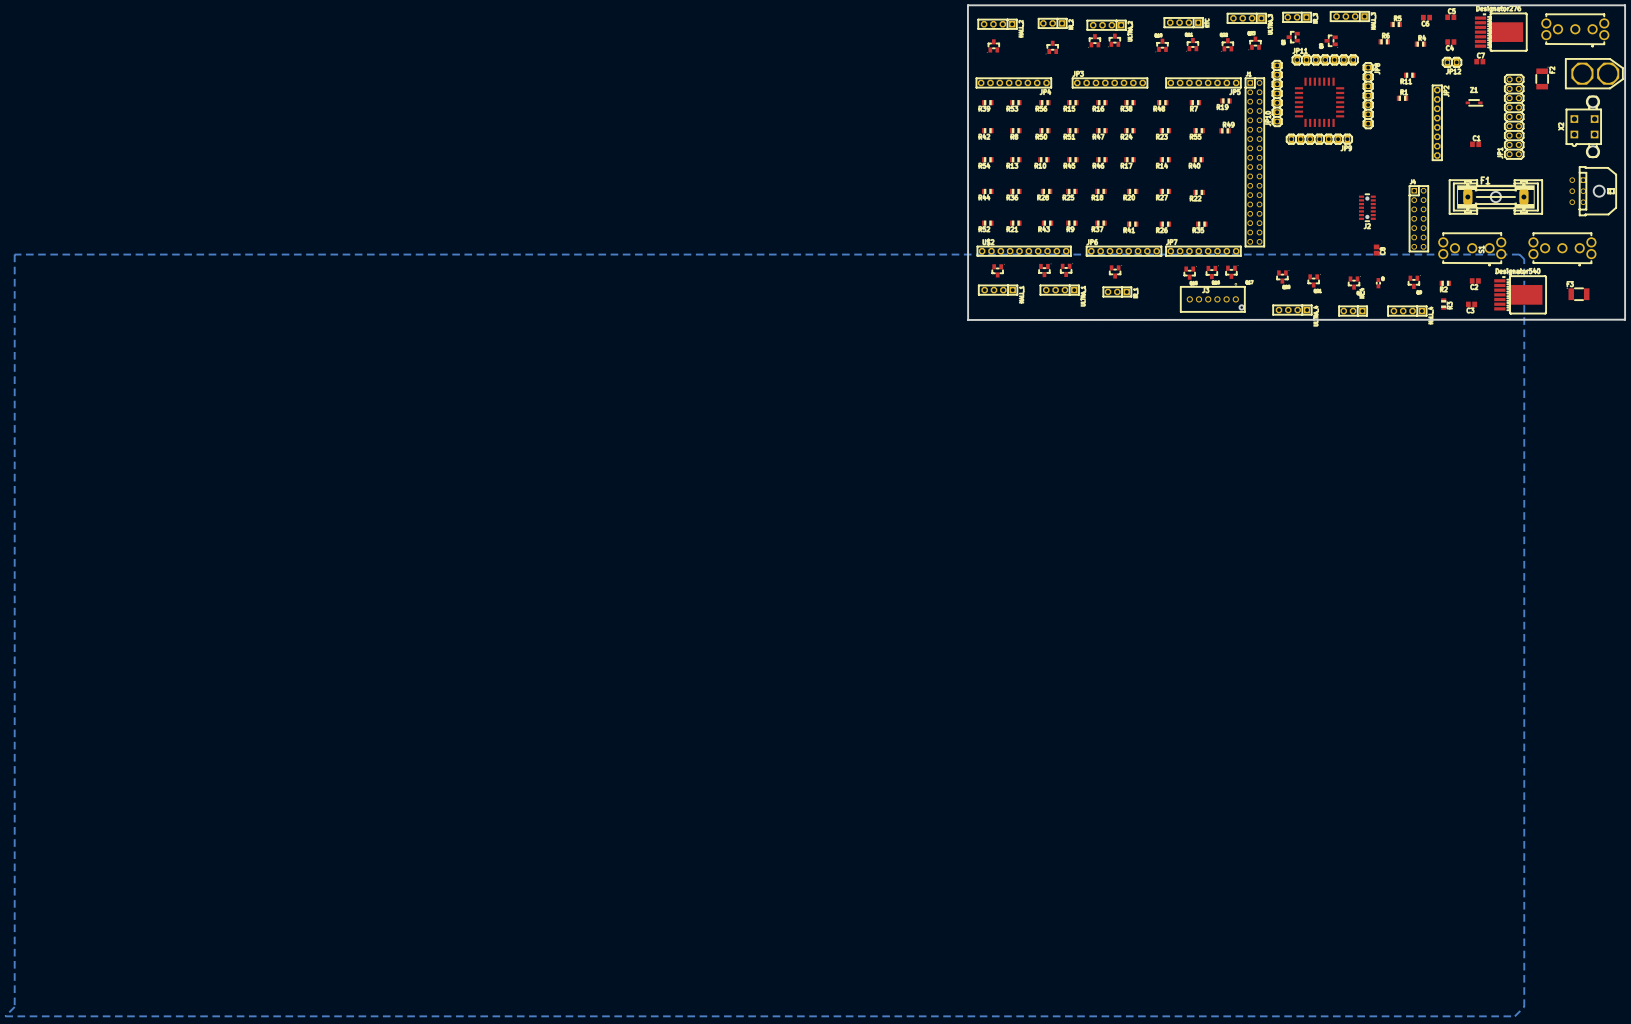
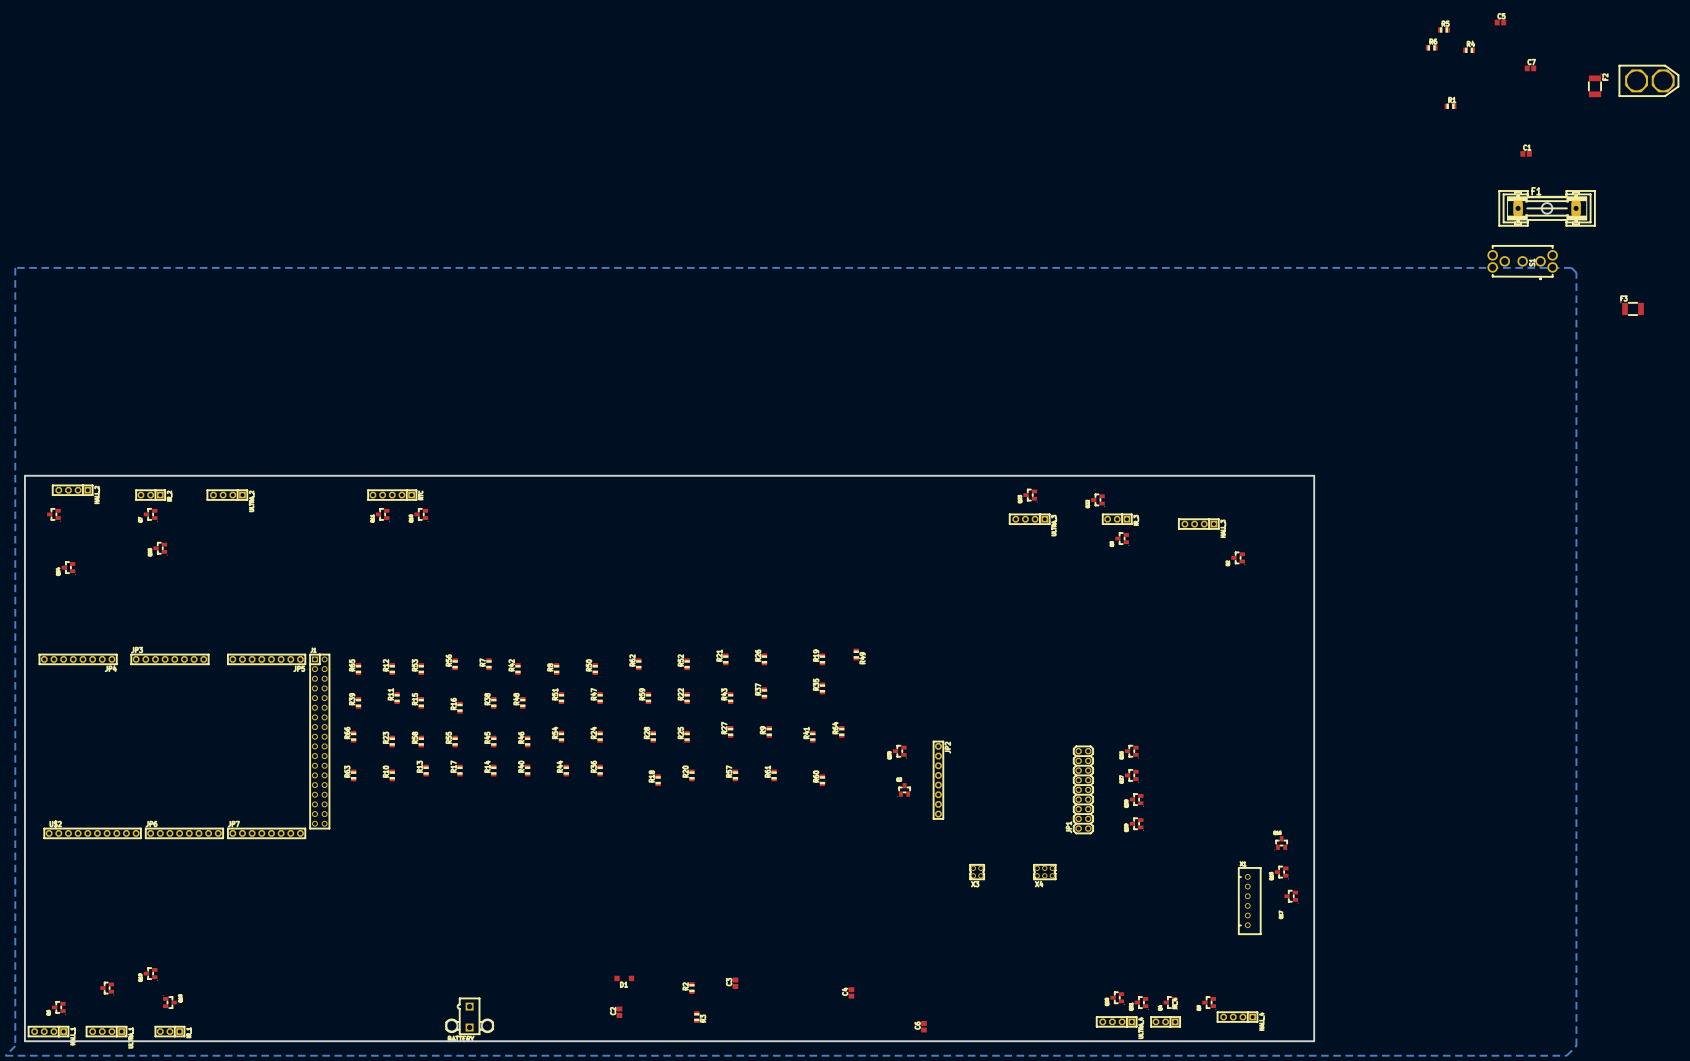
board edge: (967, 5) (1625, 5) (1625, 319) (968, 319) (967, 5) -> none
part position: (1349, 16) -> (1198, 524)
part position: (1297, 17) -> (1117, 519)
part rotation: 0° (1426, 17) -> 90° clockwise (923, 1026)
part position: (1426, 17) -> (923, 1026)
part position: (1246, 18) -> (1029, 519)
part: (1183, 22) -> none
part position: (1052, 23) -> (150, 495)
part position: (997, 24) -> (72, 490)
part position: (1106, 25) -> (227, 495)
part: (1575, 30) -> none
part: (1501, 32) -> none
part position: (1293, 37) -> (1238, 558)
part: (1094, 40) -> none
part: (1114, 40) -> none
part position: (1331, 41) -> (1122, 539)
part rotation: 0° (1450, 41) -> 90° clockwise (851, 992)
part position: (1450, 41) -> (851, 992)
part rotation: 0° (1254, 43) -> 90° counterclockwise (1030, 495)
part position: (1254, 43) -> (1030, 495)
part rotation: 0° (1192, 44) -> 90° counterclockwise (382, 515)
part position: (1192, 44) -> (382, 515)
part rotation: 0° (1227, 44) -> 90° counterclockwise (1098, 500)
part position: (1227, 44) -> (1098, 500)
part rotation: 0° (1161, 45) -> 90° counterclockwise (421, 515)
part position: (1161, 45) -> (421, 515)
part: (993, 46) -> none
part: (1051, 47) -> none
part: (1325, 59) -> none
part: (1452, 62) -> none
part rotation: 0° (1409, 75) -> 90° clockwise (397, 698)
part position: (1409, 75) -> (397, 698)
part position: (1013, 82) -> (78, 659)
part position: (1110, 82) -> (169, 659)
part position: (1203, 82) -> (266, 659)
part: (1277, 93) -> none
part: (1368, 95) -> none
part rotation: 0° (1226, 100) -> 90° clockwise (822, 659)
part position: (1226, 100) -> (822, 659)
part rotation: 0° (987, 102) -> 90° clockwise (358, 702)
part position: (987, 102) -> (358, 702)
part rotation: 0° (1015, 102) -> 90° clockwise (421, 669)
part position: (1015, 102) -> (421, 669)
part rotation: 0° (1044, 102) -> 90° clockwise (455, 664)
part position: (1044, 102) -> (455, 664)
part rotation: 0° (1072, 102) -> 90° clockwise (421, 702)
part position: (1072, 102) -> (421, 702)
part rotation: 0° (1101, 102) -> 90° clockwise (459, 707)
part position: (1101, 102) -> (459, 707)
part rotation: 0° (1129, 102) -> 90° clockwise (493, 702)
part position: (1129, 102) -> (493, 702)
part rotation: 0° (1162, 102) -> 90° clockwise (522, 702)
part position: (1162, 102) -> (522, 702)
part rotation: 0° (1195, 102) -> 90° clockwise (488, 664)
part position: (1195, 102) -> (488, 664)
part: (1319, 102) -> none
part: (1474, 102) -> none
part position: (1514, 116) -> (1083, 789)
part position: (1437, 122) -> (938, 780)
part: (1583, 126) -> none
part rotation: 0° (987, 130) -> 90° clockwise (517, 669)
part position: (987, 130) -> (517, 669)
part rotation: 0° (1015, 130) -> 90° clockwise (556, 669)
part position: (1015, 130) -> (556, 669)
part rotation: 0° (1044, 130) -> 90° clockwise (595, 669)
part position: (1044, 130) -> (595, 669)
part rotation: 0° (1072, 130) -> 90° clockwise (561, 698)
part position: (1072, 130) -> (561, 698)
part rotation: 0° (1101, 130) -> 90° clockwise (600, 698)
part position: (1101, 130) -> (600, 698)
part rotation: 0° (1129, 130) -> 90° clockwise (600, 736)
part position: (1129, 130) -> (600, 736)
part rotation: 0° (1165, 130) -> 90° clockwise (392, 741)
part position: (1165, 130) -> (392, 741)
part rotation: 0° (1199, 130) -> 90° clockwise (455, 741)
part position: (1199, 130) -> (455, 741)
part rotation: 0° (1225, 130) -> 90° clockwise (856, 654)
part position: (1225, 130) -> (856, 654)
part: (1319, 139) -> none
part rotation: 0° (987, 159) -> 90° clockwise (561, 736)
part position: (987, 159) -> (561, 736)
part rotation: 0° (1015, 159) -> 90° clockwise (426, 770)
part position: (1015, 159) -> (426, 770)
part rotation: 0° (1043, 159) -> 90° clockwise (392, 775)
part position: (1043, 159) -> (392, 775)
part rotation: 0° (1072, 159) -> 90° clockwise (493, 741)
part position: (1072, 159) -> (493, 741)
part rotation: 0° (1101, 159) -> 90° clockwise (527, 741)
part position: (1101, 159) -> (527, 741)
part rotation: 0° (1129, 159) -> 90° clockwise (459, 770)
part position: (1129, 159) -> (459, 770)
part rotation: 0° (1165, 159) -> 90° clockwise (493, 770)
part position: (1165, 159) -> (493, 770)
part rotation: 0° (1198, 159) -> 90° clockwise (527, 770)
part position: (1198, 159) -> (527, 770)
part position: (1254, 162) -> (319, 741)
part rotation: 0° (987, 191) -> 90° clockwise (566, 770)
part position: (987, 191) -> (566, 770)
part rotation: 0° (1015, 191) -> 90° clockwise (600, 770)
part position: (1015, 191) -> (600, 770)
part rotation: 0° (1046, 191) -> 90° clockwise (653, 736)
part position: (1046, 191) -> (653, 736)
part rotation: 0° (1071, 191) -> 90° clockwise (687, 736)
part position: (1071, 191) -> (687, 736)
part rotation: 0° (1100, 191) -> 90° clockwise (658, 780)
part position: (1100, 191) -> (658, 780)
part rotation: 0° (1132, 191) -> 90° clockwise (691, 775)
part position: (1132, 191) -> (691, 775)
part rotation: 0° (1165, 191) -> 90° clockwise (730, 731)
part position: (1165, 191) -> (730, 731)
part: (1593, 191) -> none
part rotation: 0° (1199, 192) -> 90° clockwise (687, 698)
part position: (1199, 192) -> (687, 698)
part: (1367, 207) -> none
part: (1418, 218) -> none
part rotation: 0° (987, 223) -> 90° clockwise (687, 664)
part position: (987, 223) -> (687, 664)
part rotation: 0° (1015, 223) -> 90° clockwise (725, 659)
part position: (1015, 223) -> (725, 659)
part rotation: 0° (1047, 223) -> 90° clockwise (730, 698)
part position: (1047, 223) -> (730, 698)
part rotation: 0° (1071, 223) -> 90° clockwise (769, 731)
part position: (1071, 223) -> (769, 731)
part rotation: 0° (1100, 223) -> 90° clockwise (764, 693)
part position: (1100, 223) -> (764, 693)
part rotation: 0° (1132, 224) -> 90° clockwise (812, 736)
part position: (1132, 224) -> (812, 736)
part rotation: 0° (1165, 224) -> 90° clockwise (764, 659)
part position: (1165, 224) -> (764, 659)
part rotation: 0° (1201, 224) -> 90° clockwise (822, 688)
part position: (1201, 224) -> (822, 688)
part: (1562, 249) -> none
part: (1376, 250) -> none
part position: (1024, 251) -> (92, 833)
part position: (1124, 251) -> (184, 833)
part position: (1203, 251) -> (266, 833)
part: (998, 270) -> none
part: (1045, 270) -> none
part: (1066, 270) -> none
part: (1115, 271) -> none
part rotation: 0° (1190, 272) -> 90° clockwise (1281, 872)
part position: (1190, 272) -> (1281, 872)
part rotation: 0° (1212, 272) -> 180° (1280, 843)
part position: (1212, 272) -> (1280, 843)
part rotation: 0° (1232, 272) -> 90° clockwise (1291, 896)
part position: (1232, 272) -> (1291, 896)
part rotation: 0° (1283, 276) -> 90° clockwise (1117, 998)
part position: (1283, 276) -> (1117, 998)
part rotation: 0° (1314, 280) -> 90° clockwise (1141, 1003)
part position: (1314, 280) -> (1141, 1003)
part rotation: 0° (1475, 280) -> 90° clockwise (619, 1012)
part position: (1475, 280) -> (619, 1012)
part rotation: 0° (1354, 282) -> 90° clockwise (1170, 1003)
part position: (1354, 282) -> (1170, 1003)
part rotation: 0° (1414, 282) -> 90° clockwise (1209, 1003)
part position: (1414, 282) -> (1209, 1003)
part: (1378, 283) -> none
part rotation: 0° (1445, 283) -> 90° clockwise (691, 988)
part position: (1445, 283) -> (691, 988)
part position: (998, 290) -> (48, 1031)
part position: (1059, 290) -> (106, 1031)
part position: (1117, 291) -> (169, 1031)
part: (1520, 294) -> none
part: (1212, 297) -> none
part position: (1443, 304) -> (696, 1017)
part rotation: 0° (1471, 304) -> 90° clockwise (735, 983)
part position: (1471, 304) -> (735, 983)
part position: (1292, 310) -> (1116, 1021)
part position: (1353, 311) -> (1165, 1021)
part position: (1407, 311) -> (1237, 1017)
board edge: none -> (24, 475) (1314, 475) (1314, 1041) (24, 1041) (24, 475)
part: none -> (392, 495)
part: none -> (54, 515)
part: none -> (150, 515)
part: none -> (160, 548)
part: none -> (68, 568)
part: none -> (638, 664)
part: none -> (358, 669)
part: none -> (392, 669)
part: none -> (648, 698)
part: none -> (841, 731)
part: none -> (353, 736)
part: none -> (421, 741)
part: none -> (899, 751)
part: none -> (1131, 751)
part: none -> (353, 775)
part: none -> (735, 775)
part: none -> (774, 775)
part: none -> (1131, 776)
part: none -> (822, 780)
part: none -> (903, 790)
part: none -> (1136, 800)
part: none -> (1136, 824)
part: none -> (977, 872)
part: none -> (1044, 872)
part: none -> (1249, 901)
part: none -> (150, 974)
part: none -> (624, 978)
part: none -> (107, 988)
part: none -> (169, 1001)
part: none -> (58, 1008)
part: none -> (469, 1016)

